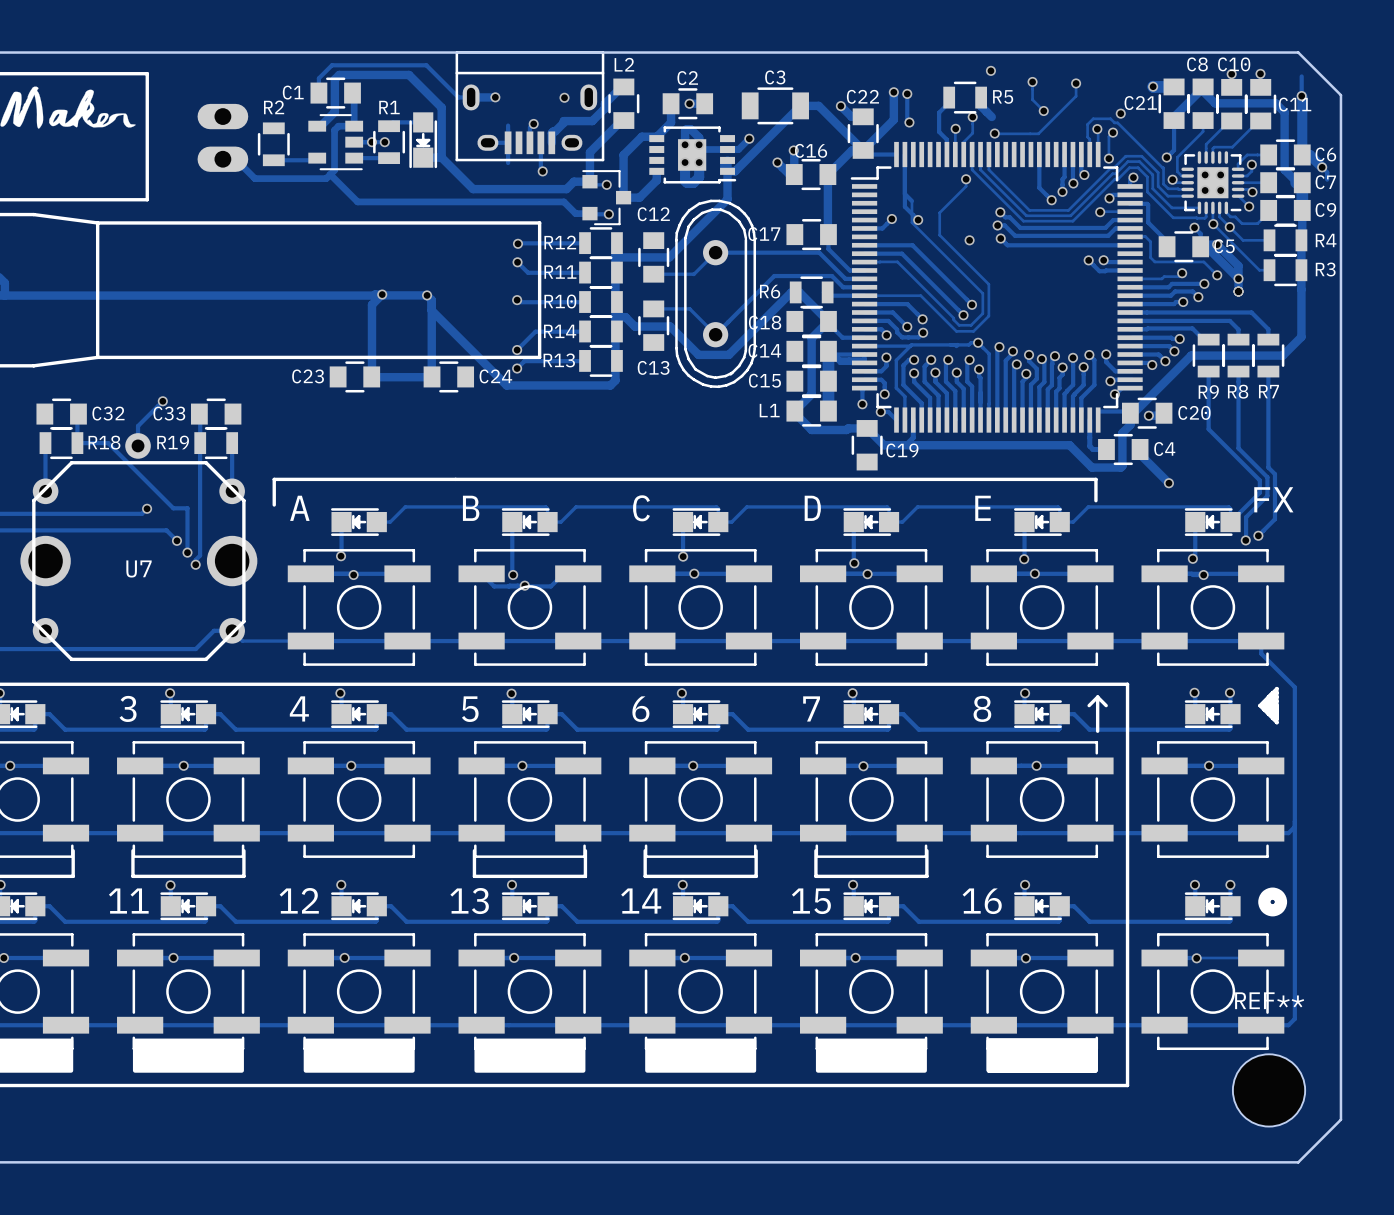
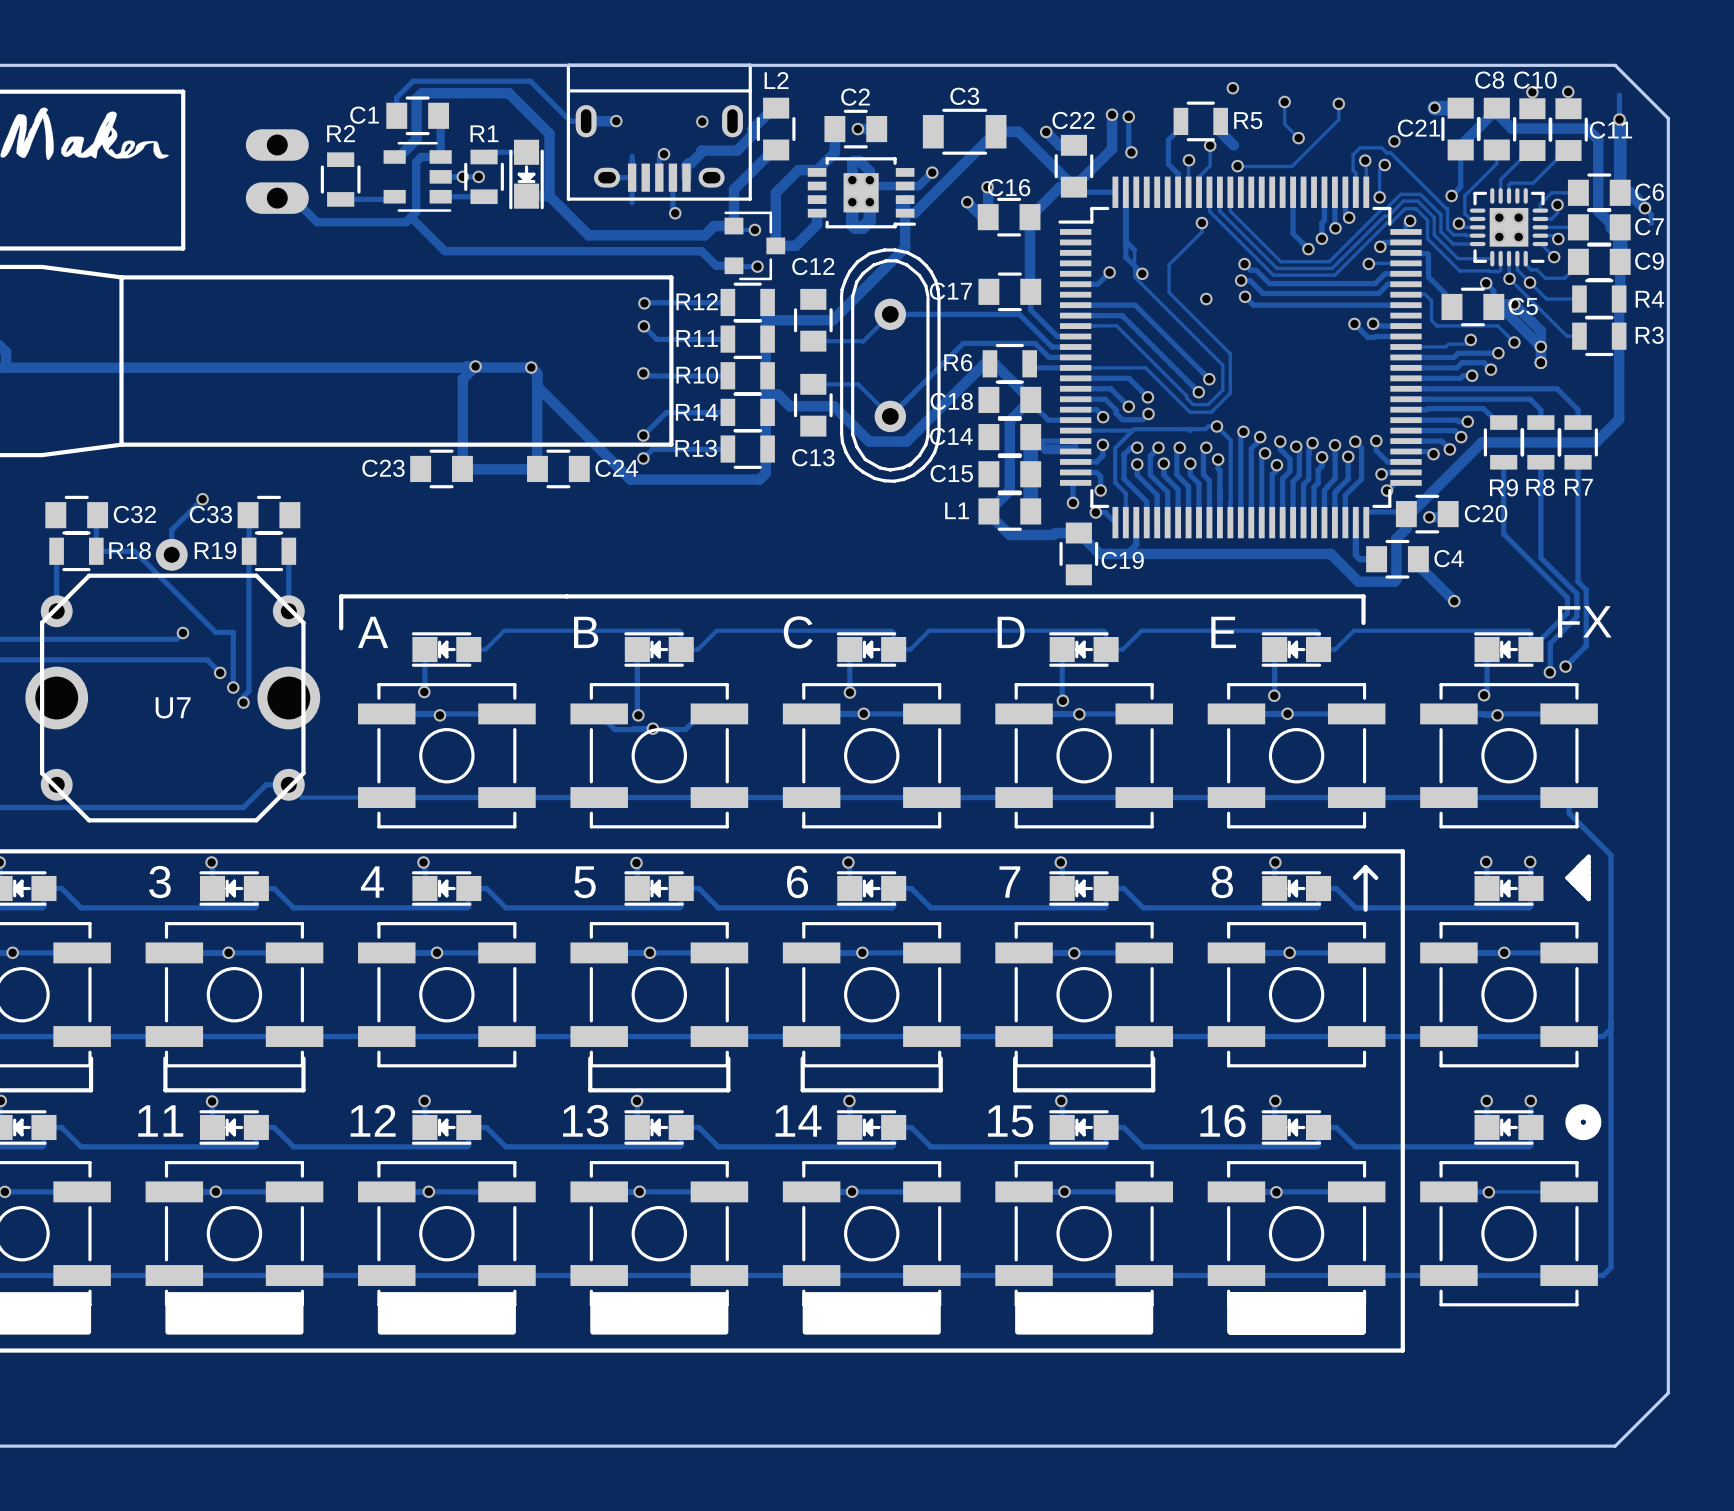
REF**: (1269, 1090) -> none

